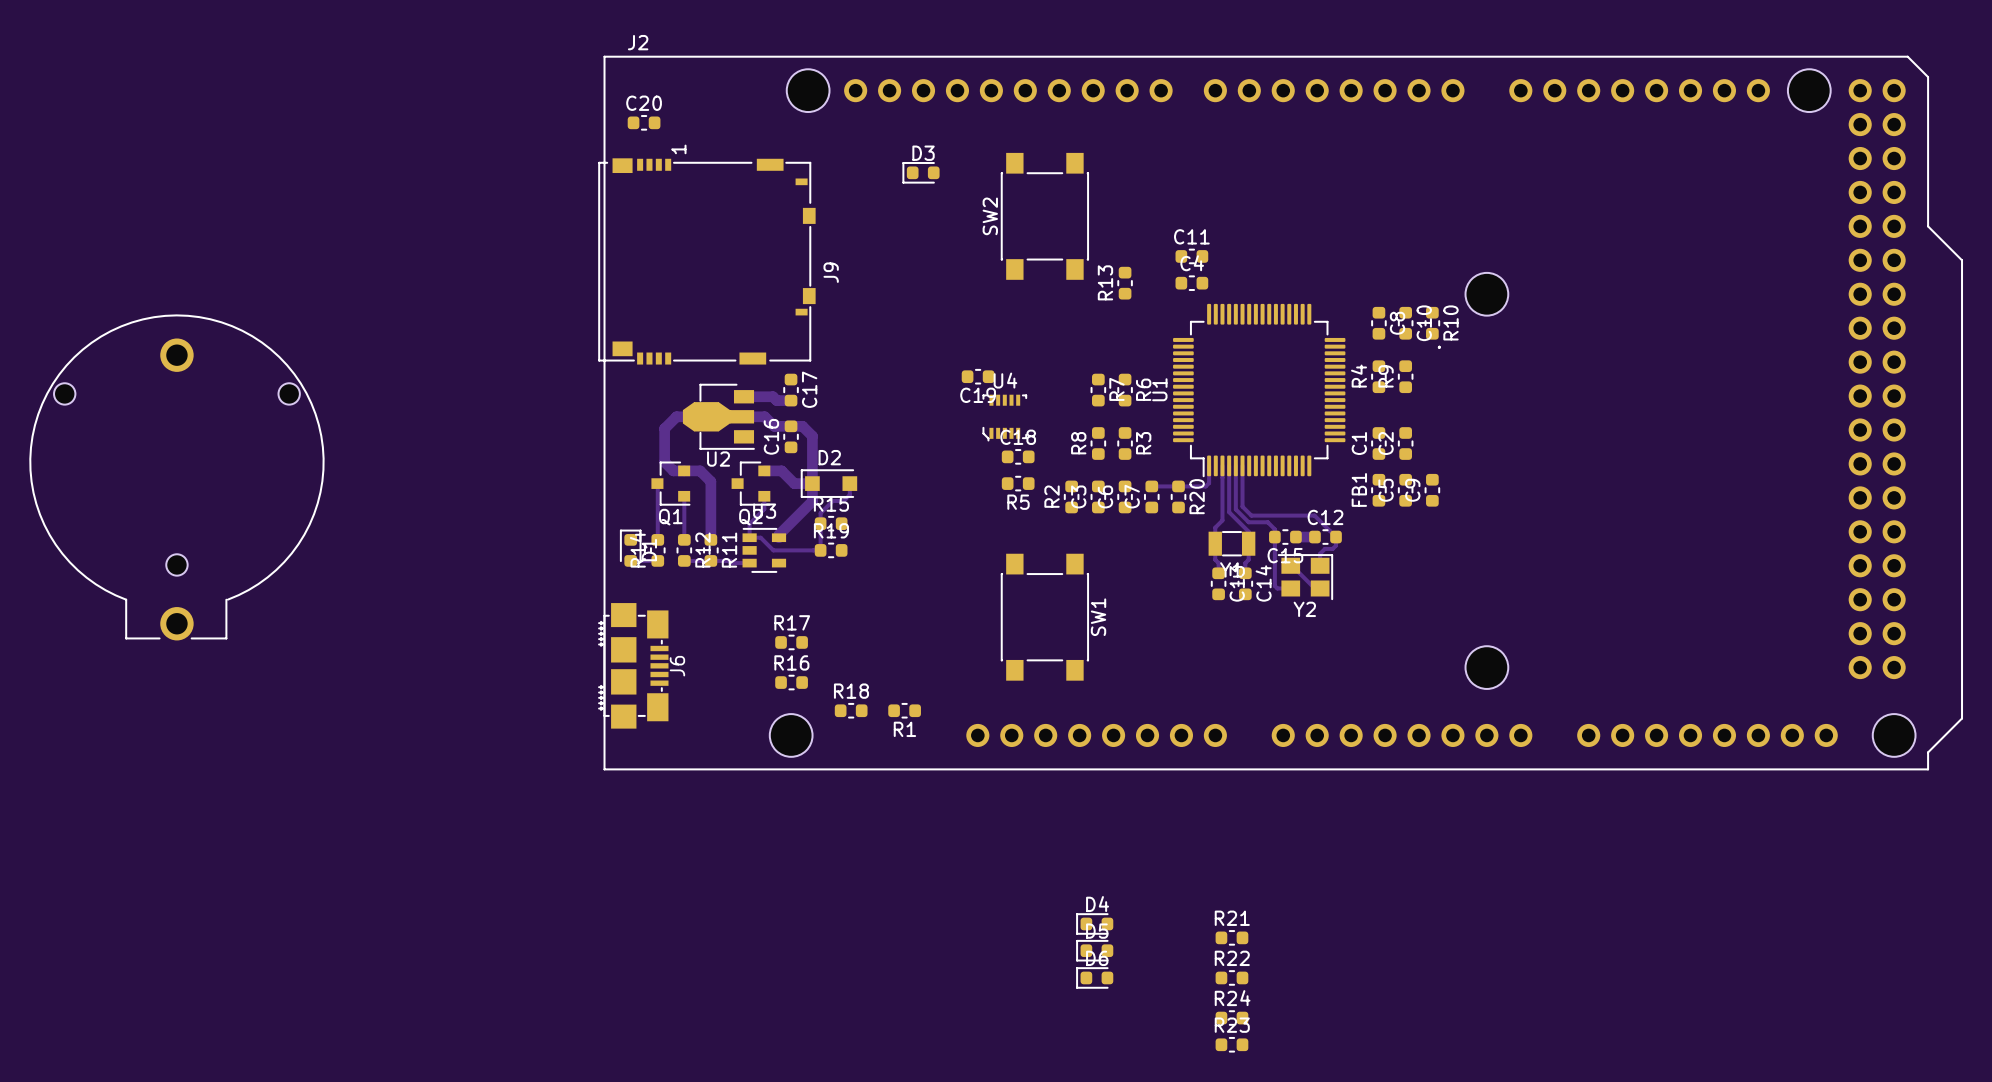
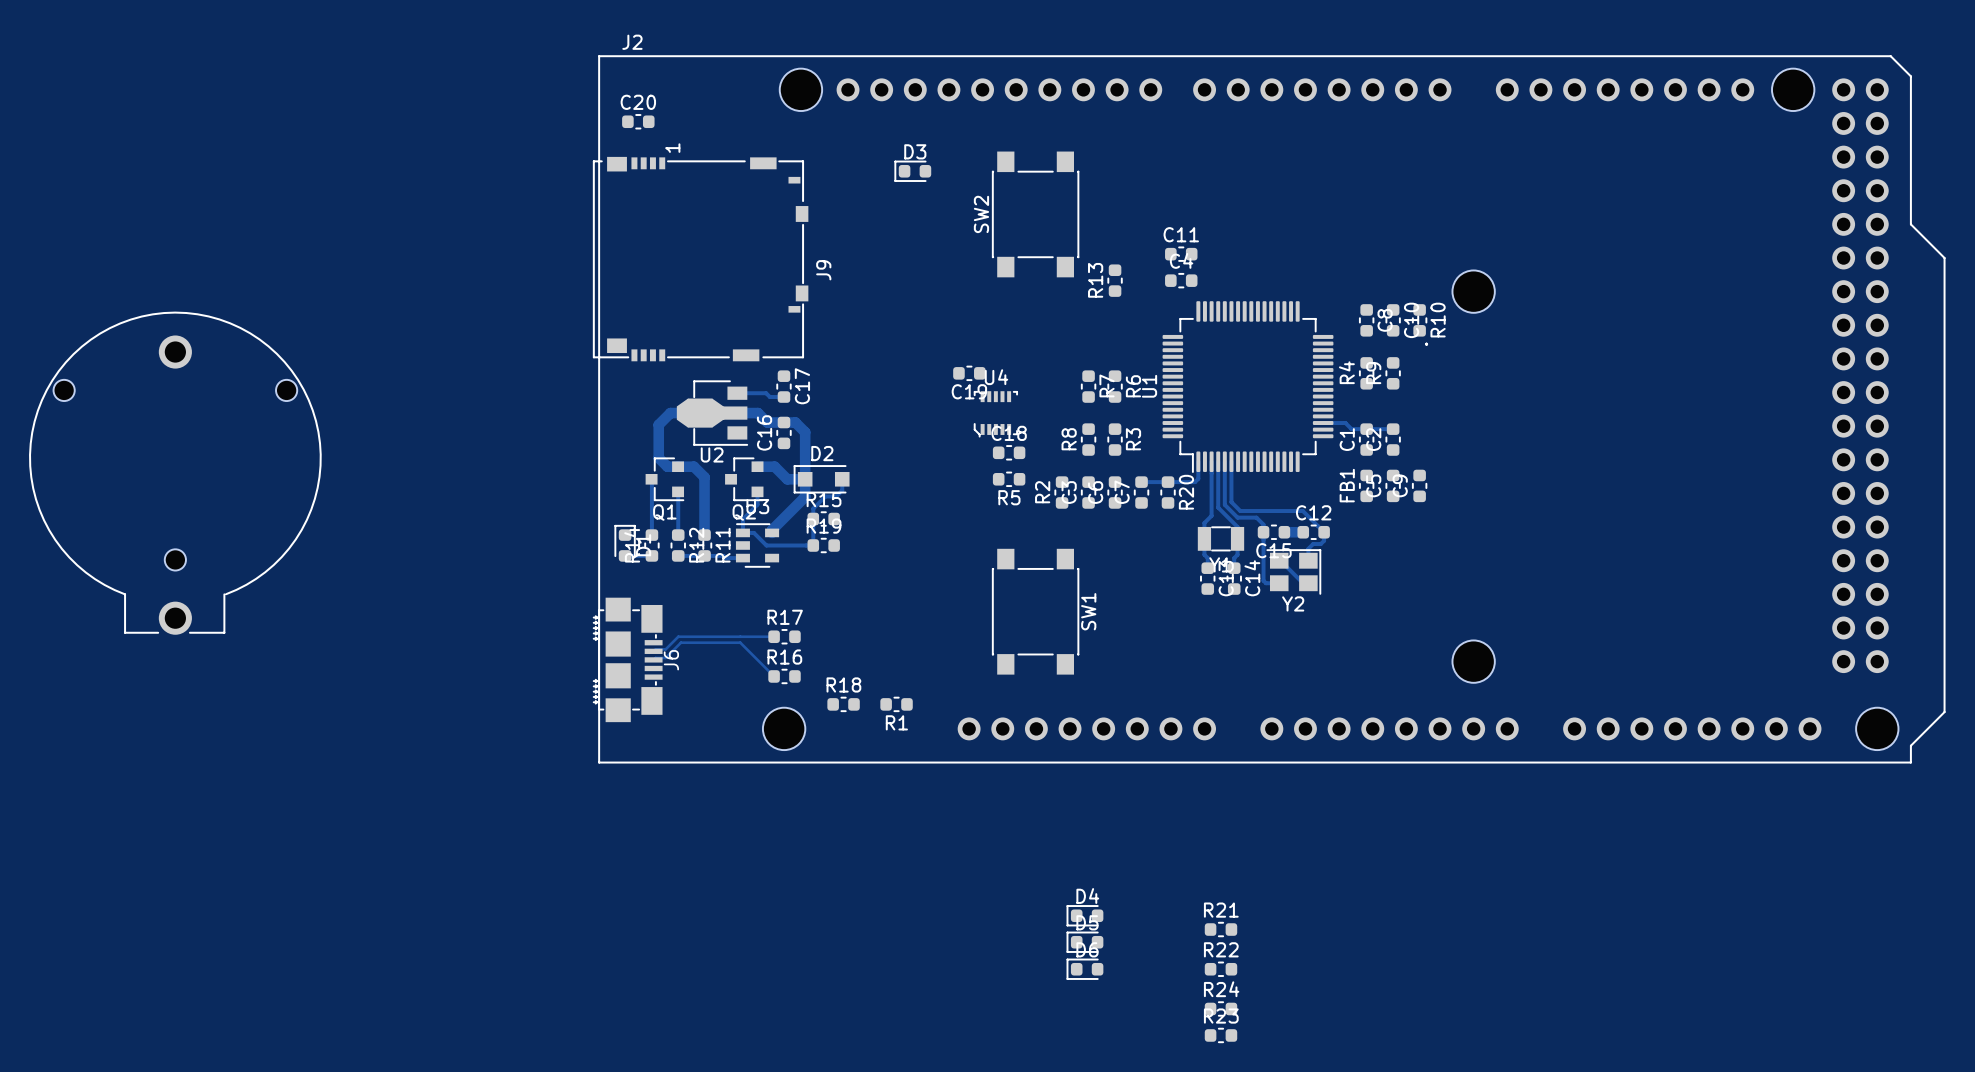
track width: thick (744, 396) (773, 396) (776, 400) (791, 400) -> thin (737, 393) (766, 393) (769, 397) (783, 397)
track: none -> (1323, 423) (1345, 423) (1351, 429) (1393, 429)
track: none -> (774, 636) (678, 636) (665, 649) (655, 649) (653, 651)
track: none -> (653, 659) (655, 657) (665, 657) (680, 642) (740, 642) (774, 676)

